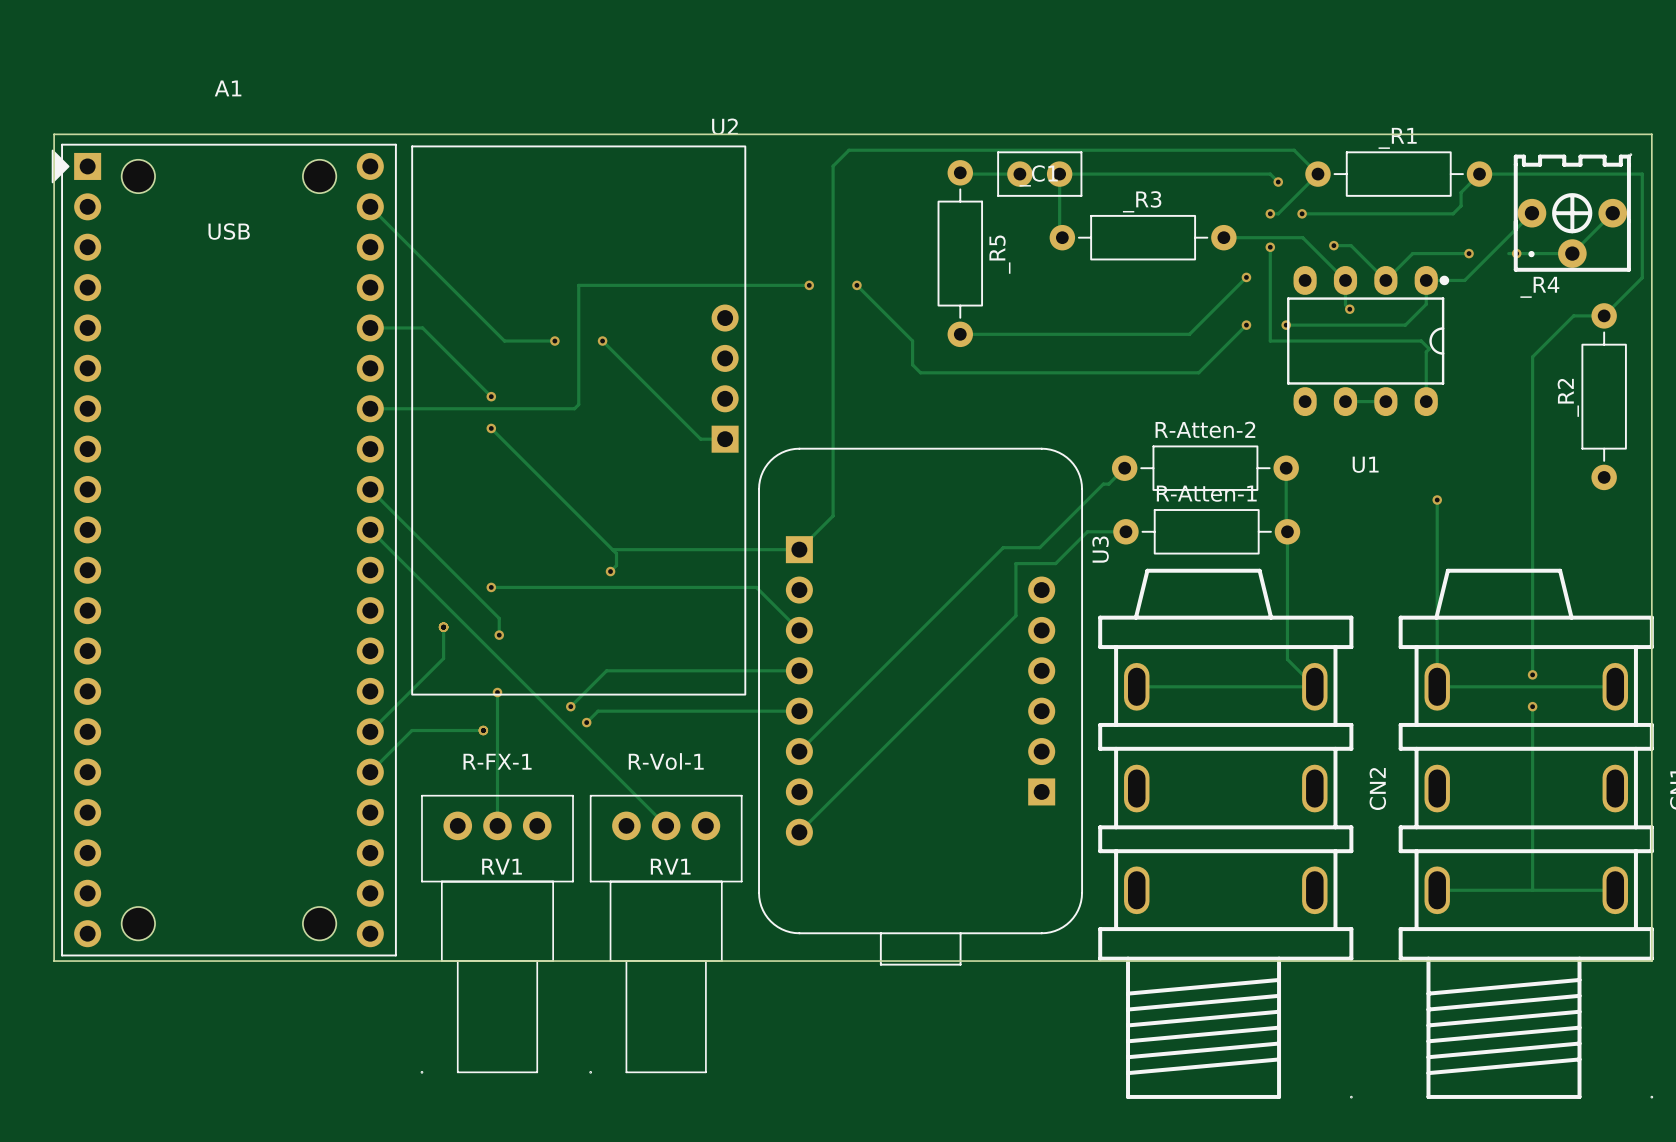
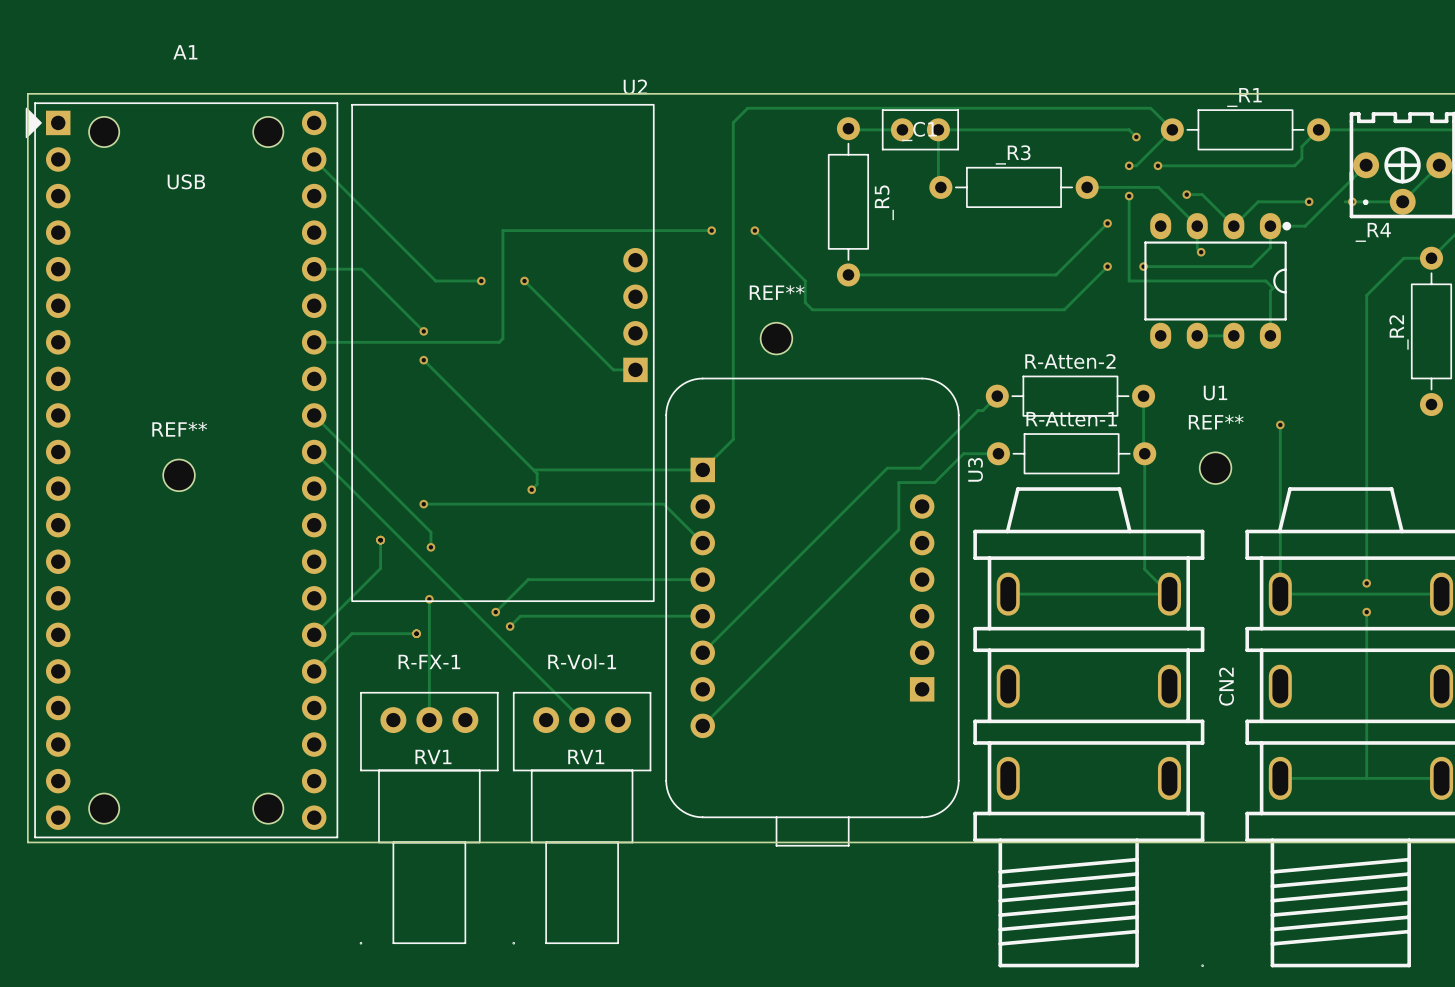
REF**: none -> (776, 338)
REF**: none -> (1215, 468)
REF**: none -> (179, 475)

